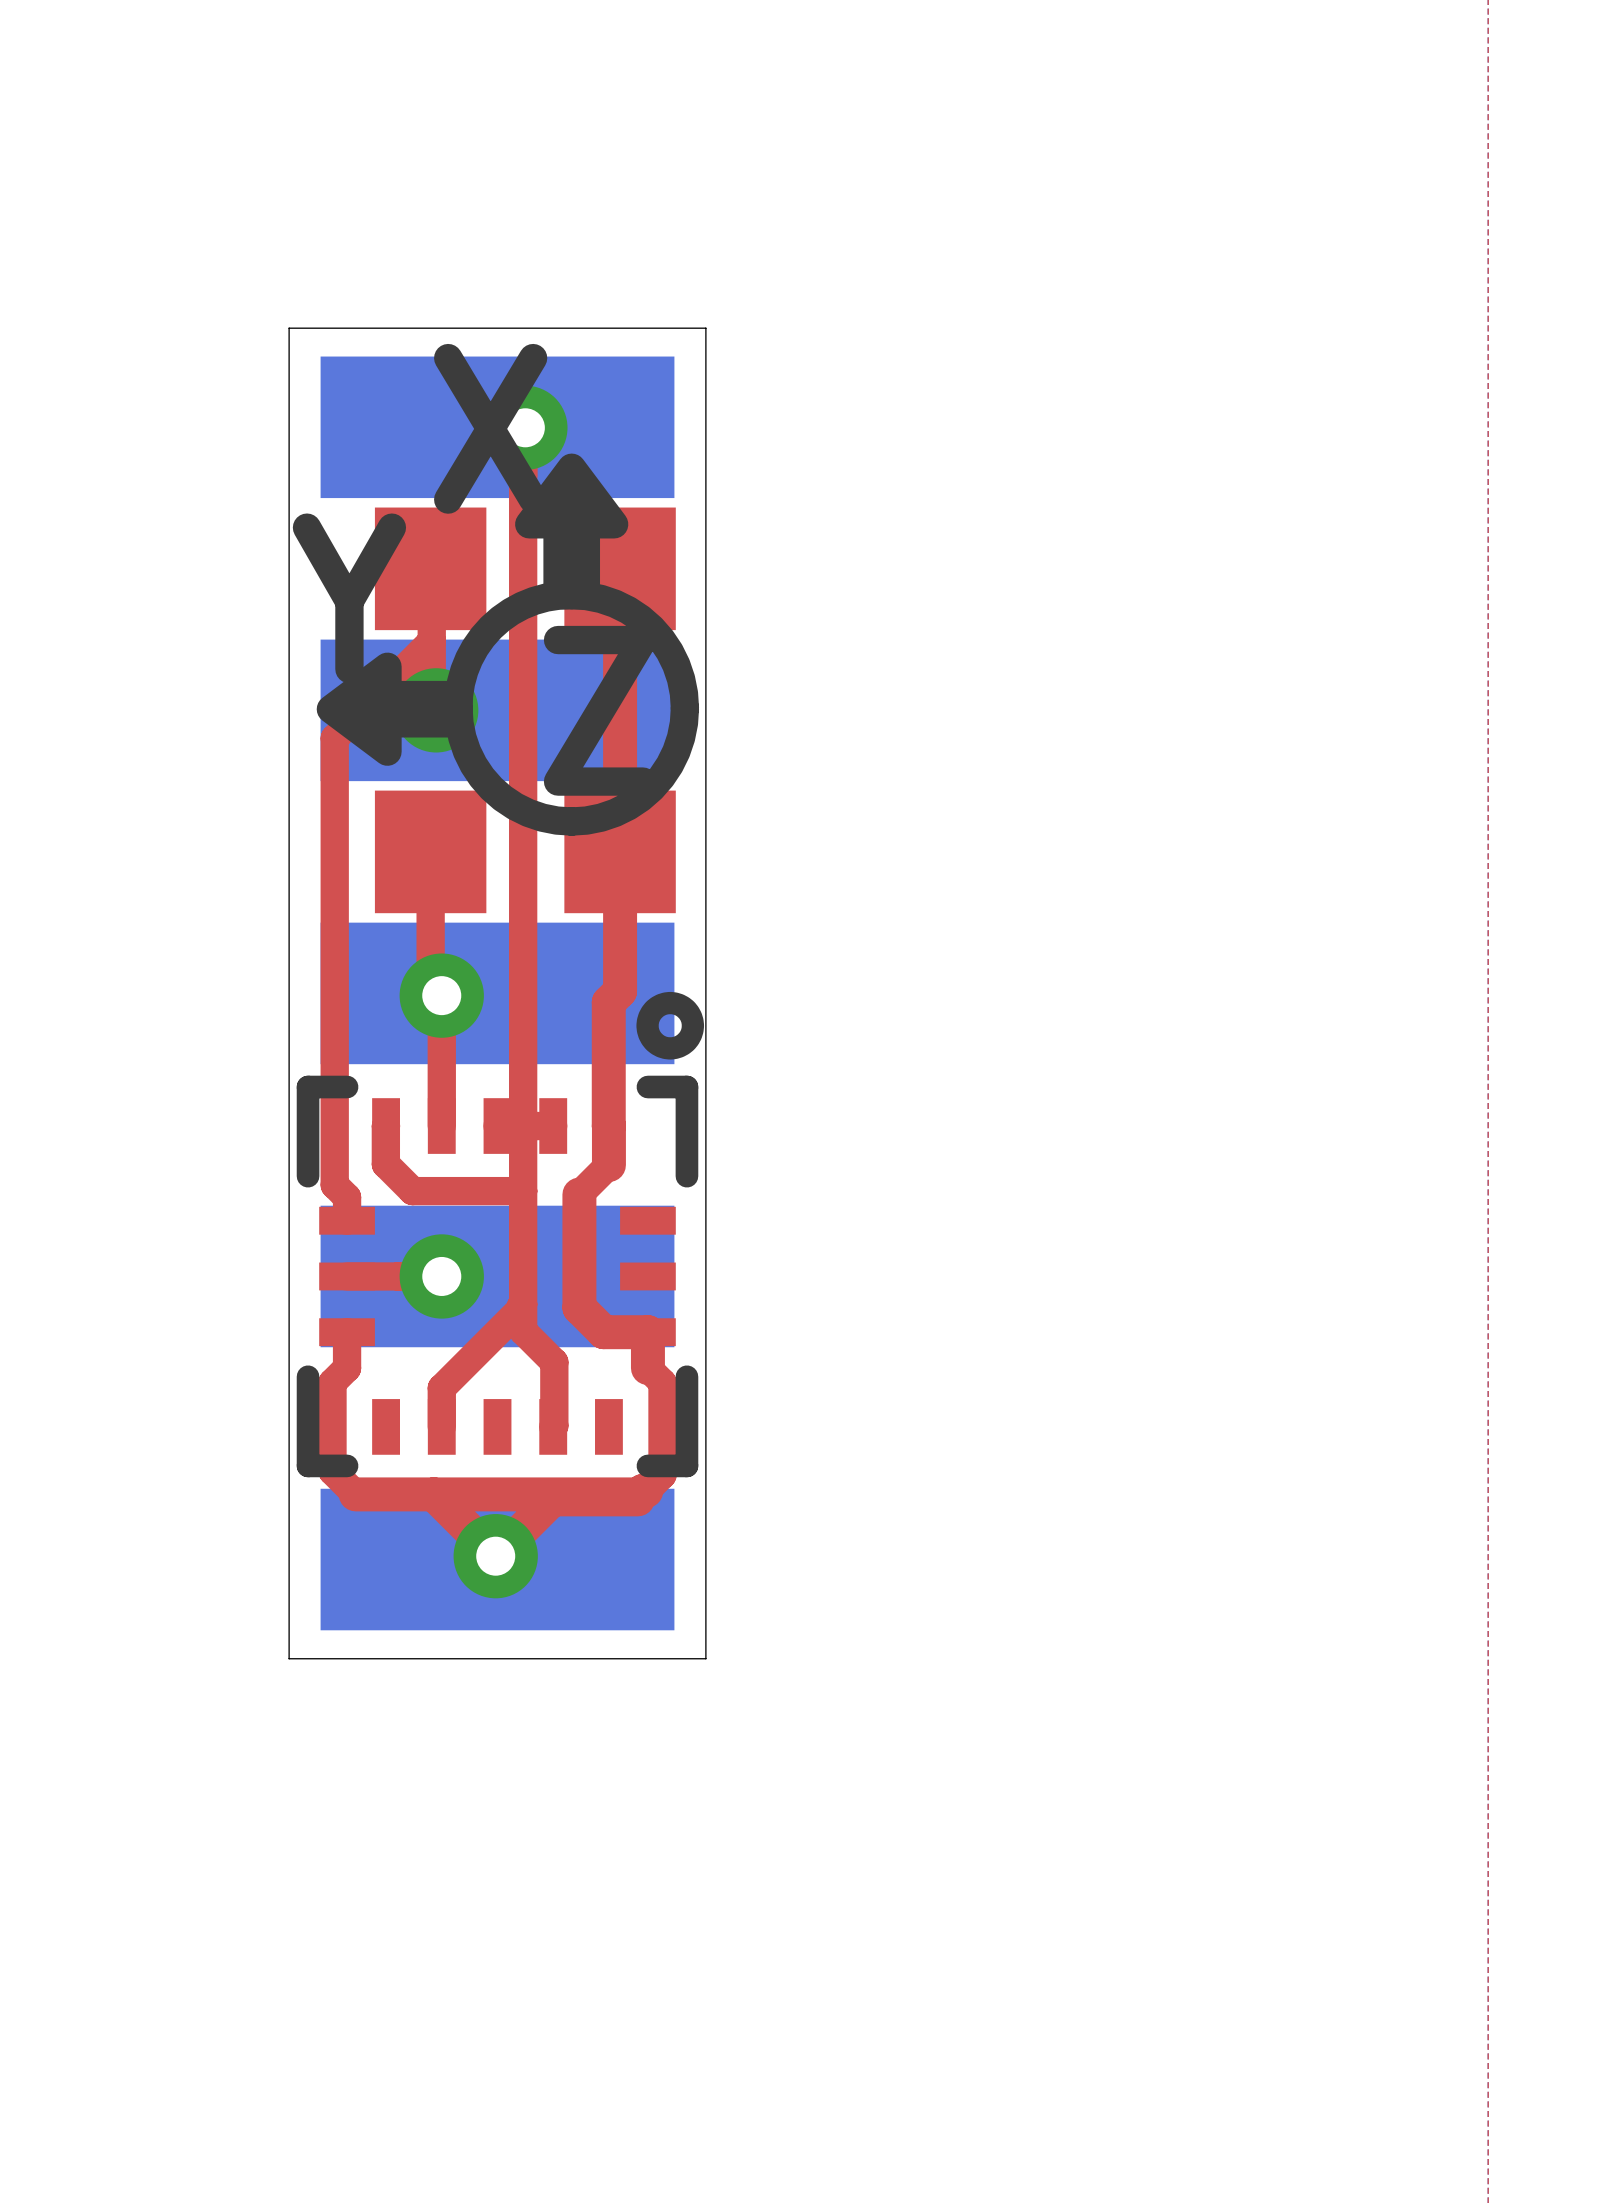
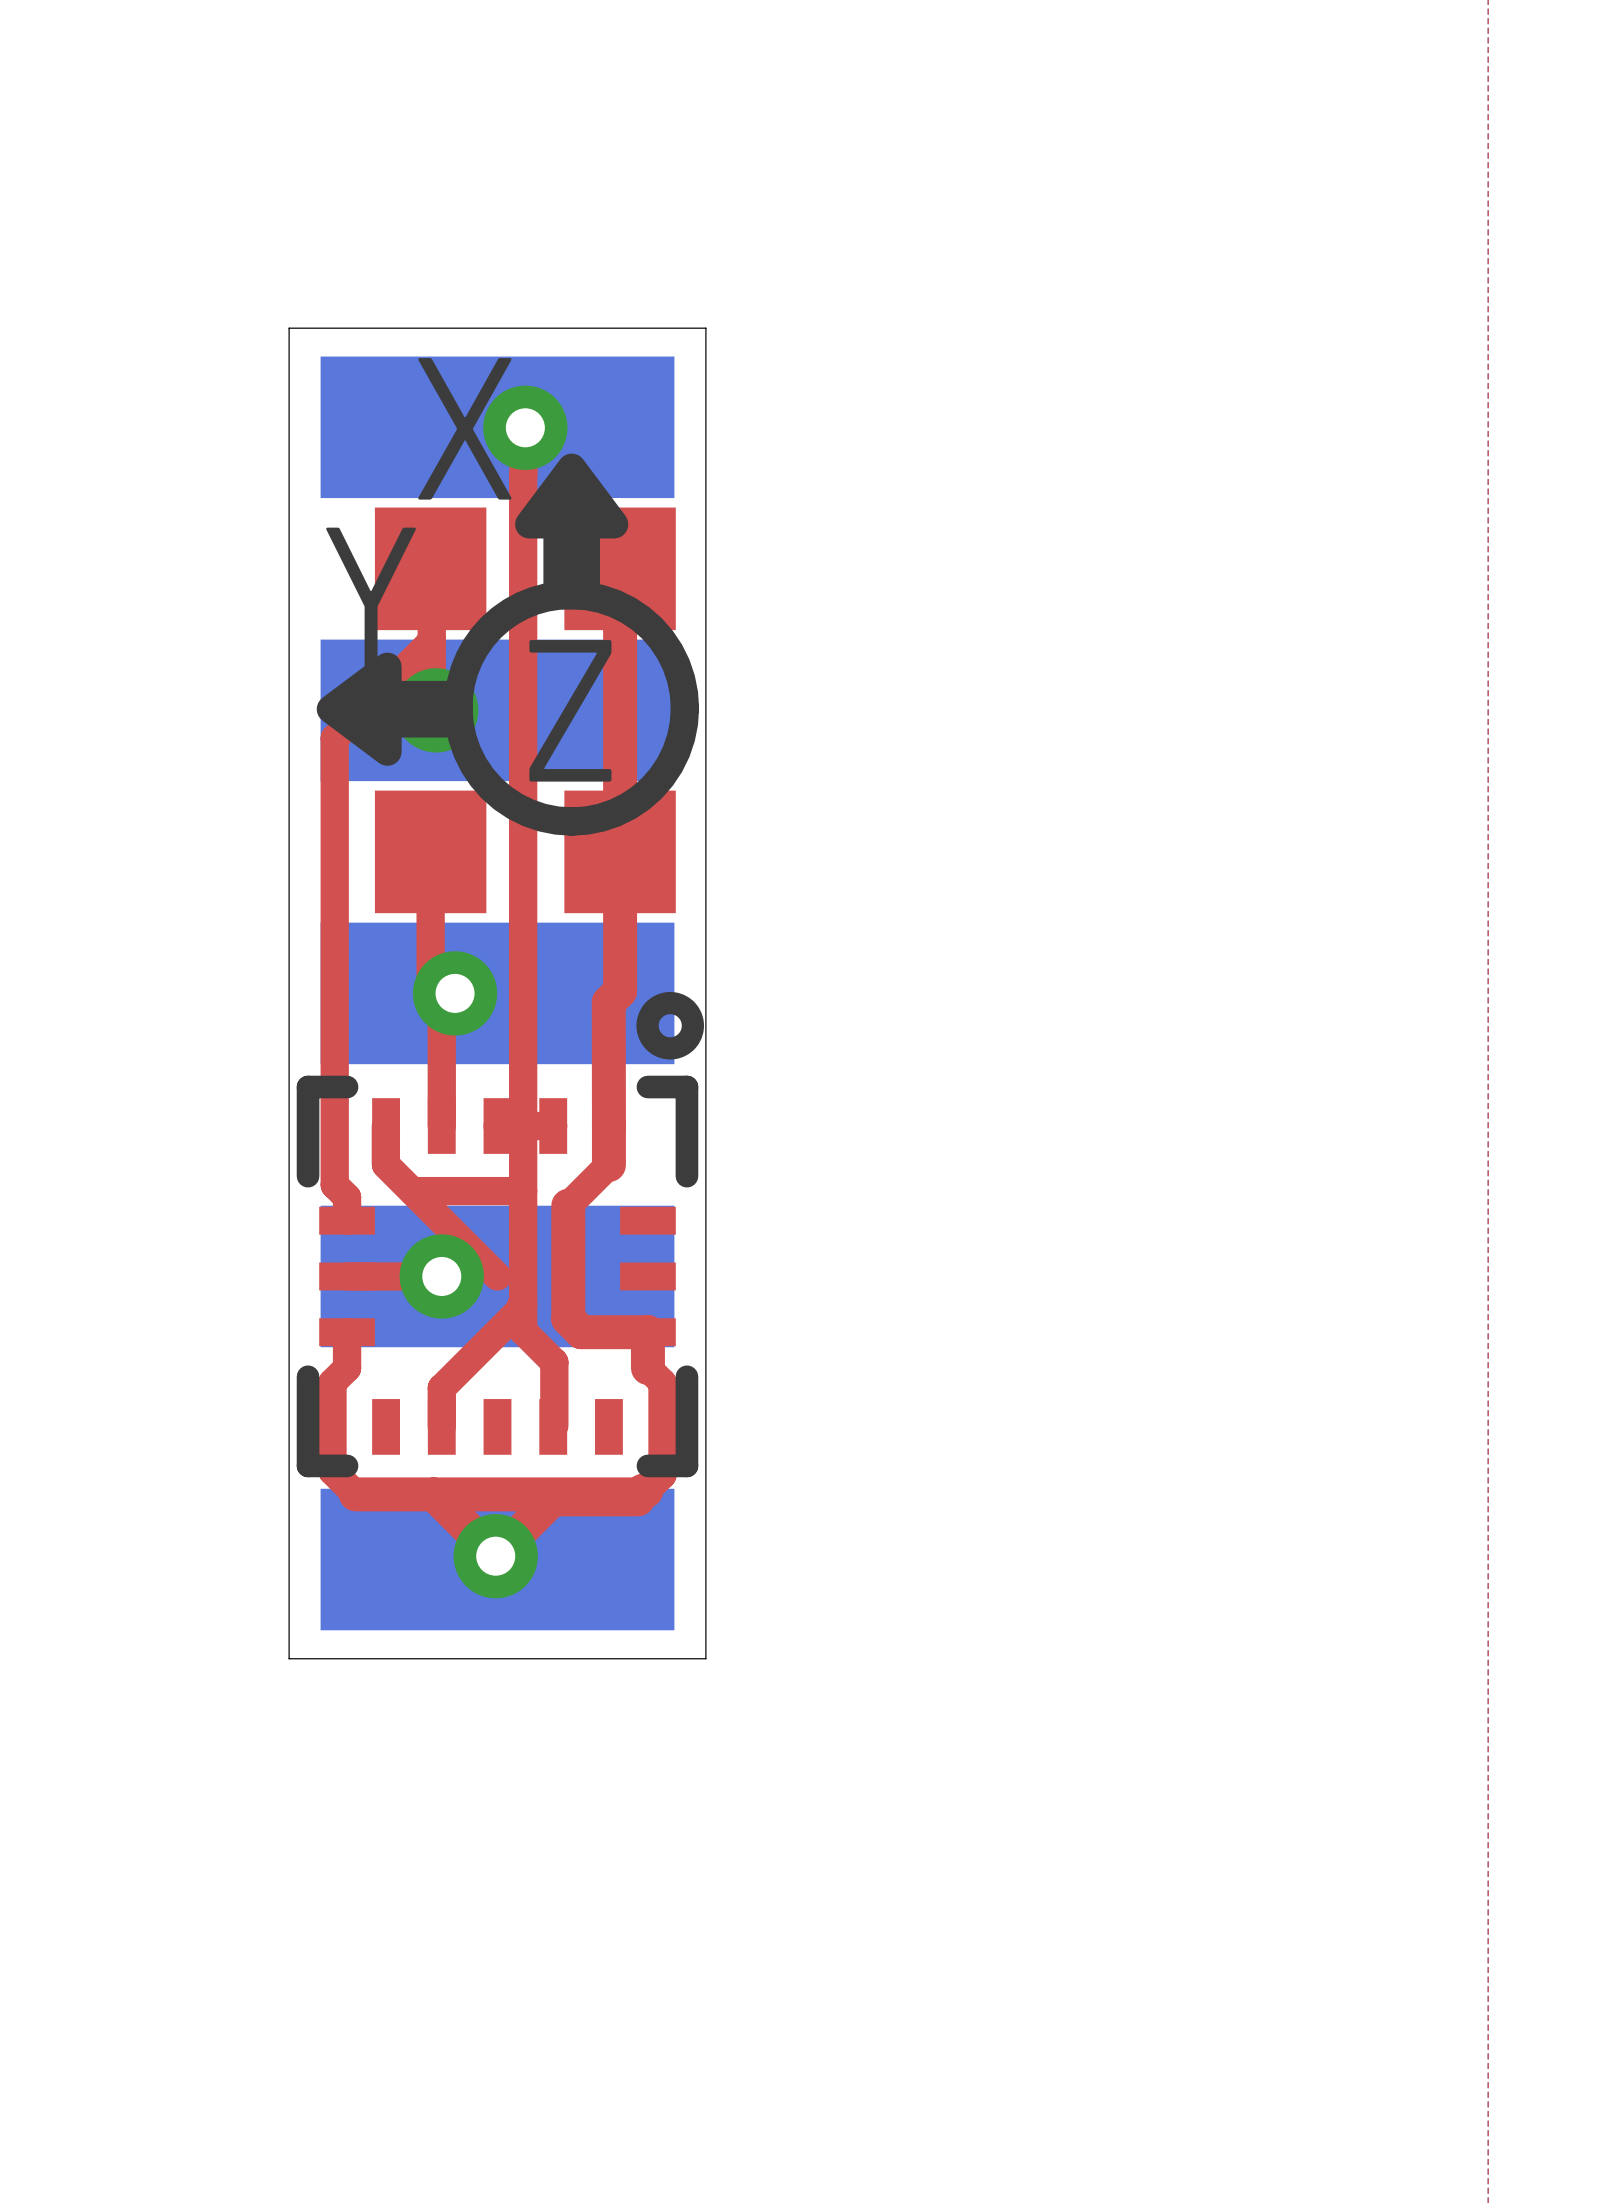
via position: (441, 995) -> (455, 993)
top track: (579, 1194) (579, 1307) (603, 1332) -> (579, 1194) (568, 1205) (568, 1318) (581, 1332) (603, 1332)

